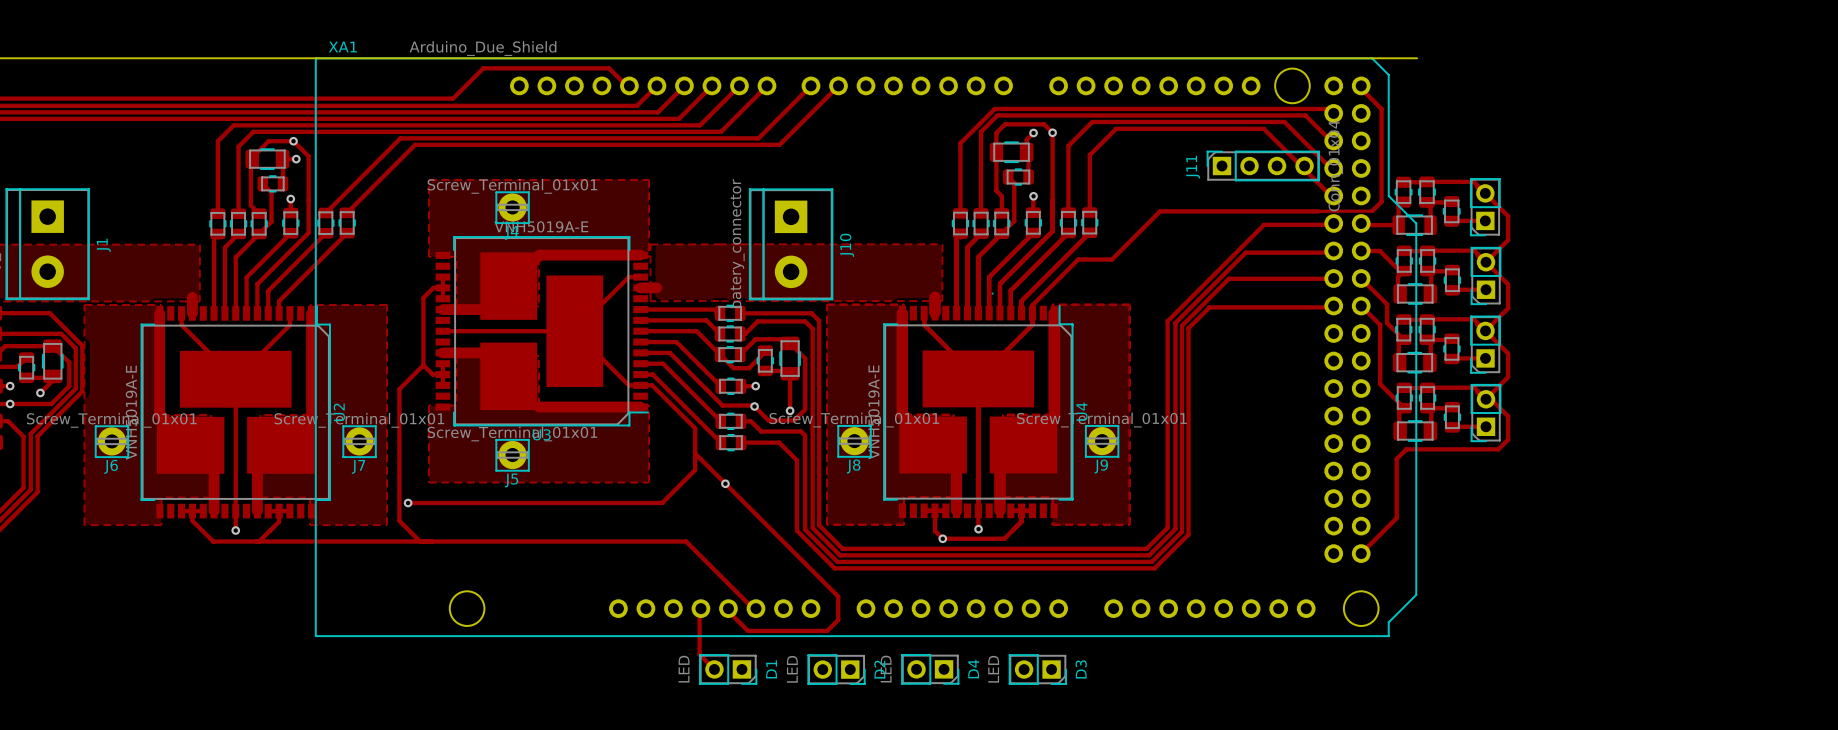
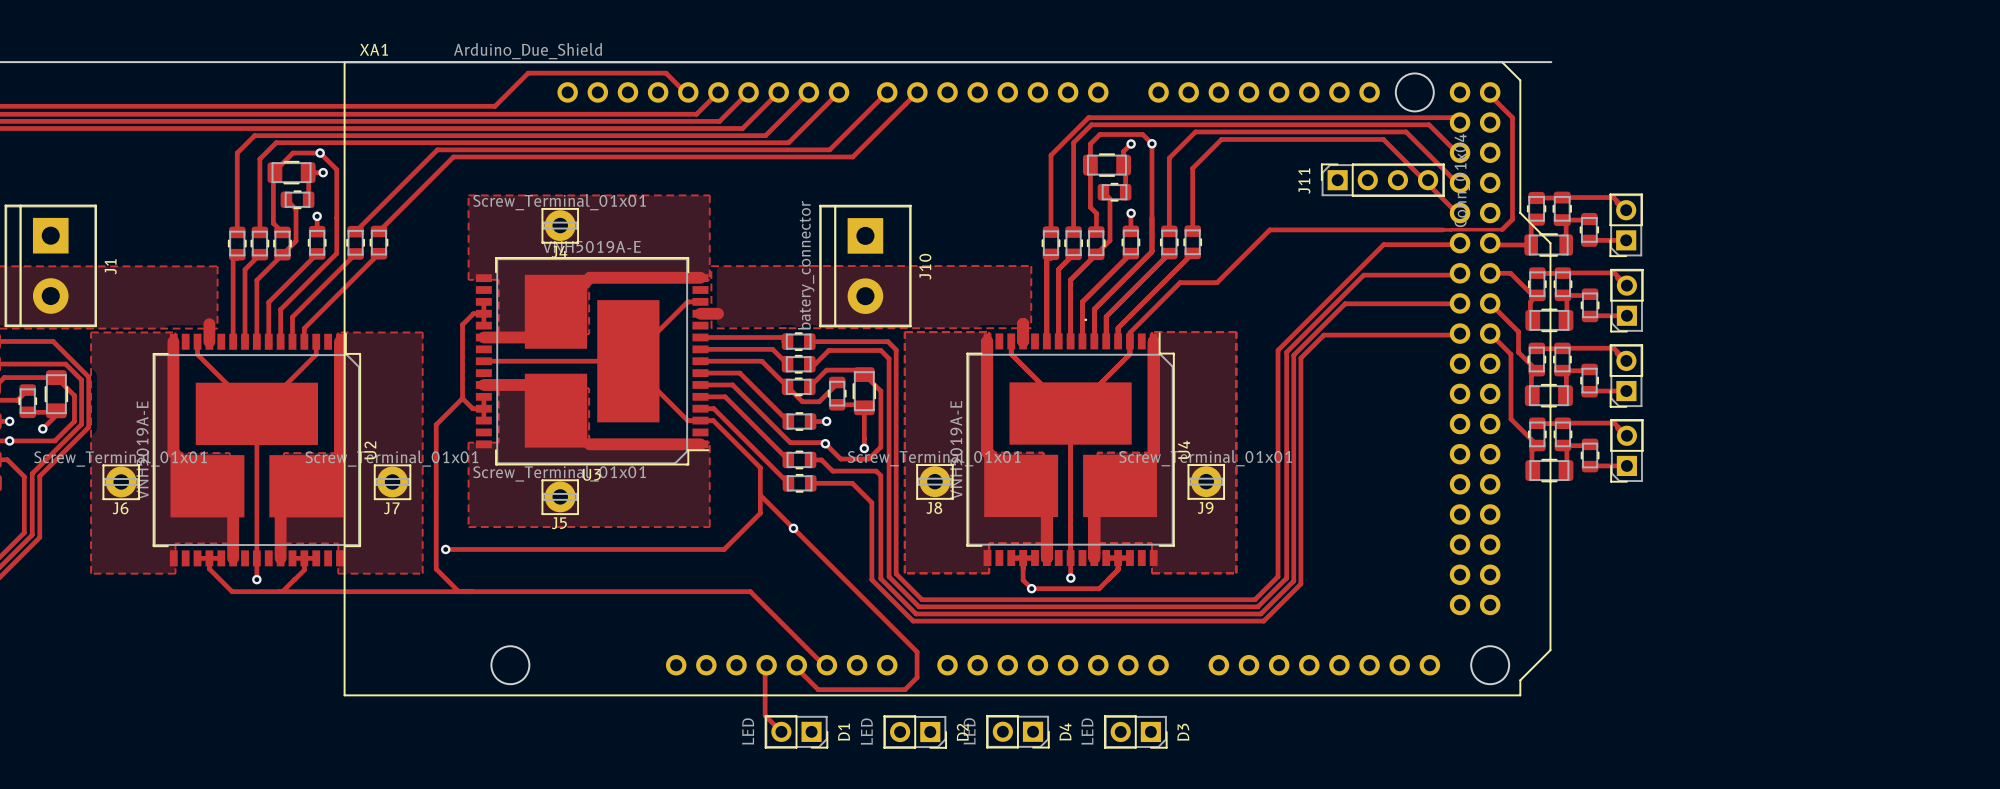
track: (1485, 193) (1508, 216) (1508, 240) (1486, 262) (1508, 284) (1508, 308) (1485, 330) (1508, 353) (1508, 377) (1486, 399) (1491, 399) (1508, 416) (1508, 439) (1498, 449) (1406, 449) (1396, 458) (1396, 518) (1361, 553) -> none

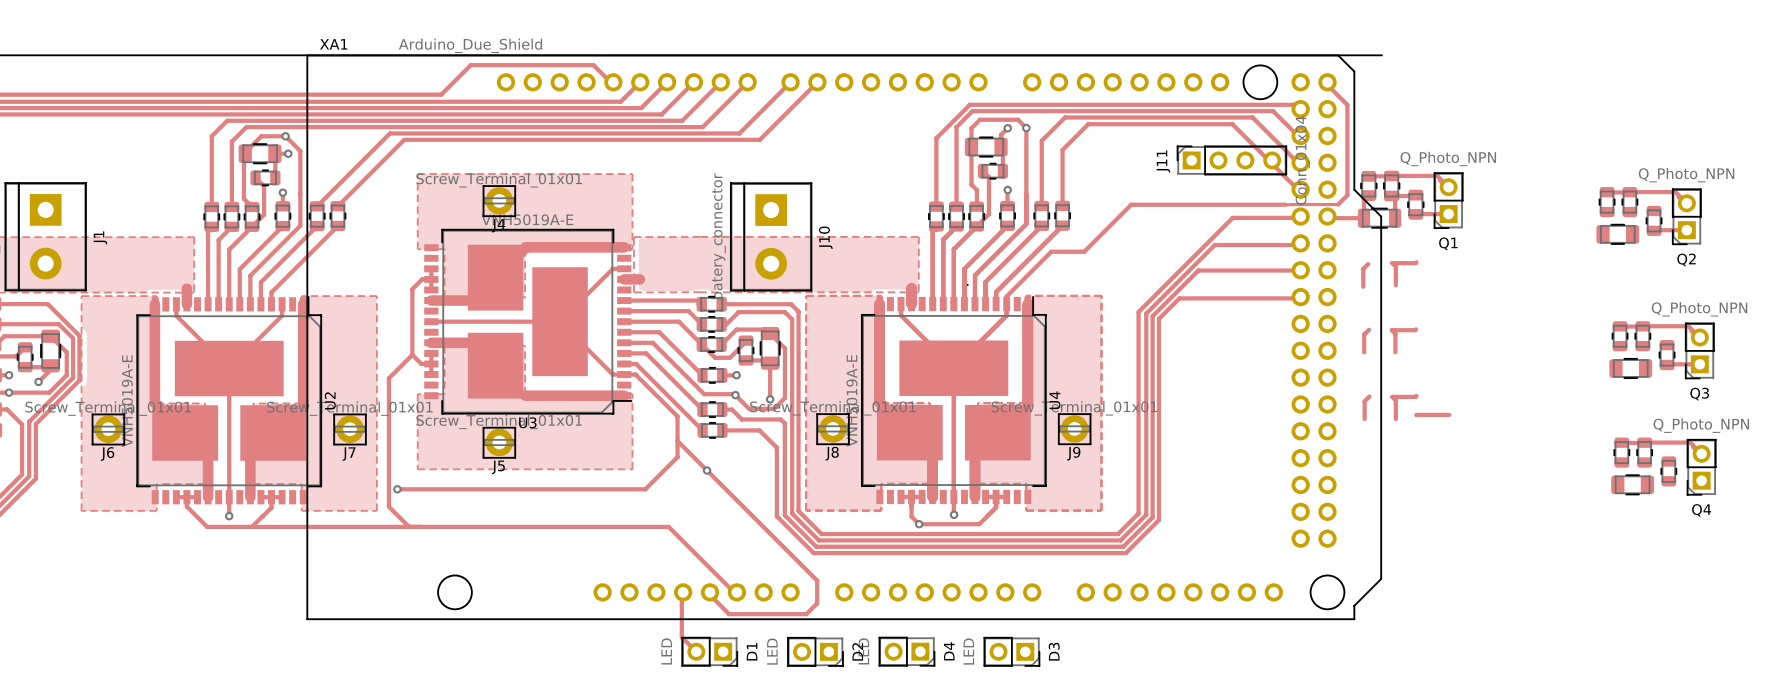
Q1 value: none -> Q_Photo_NPN (1448, 159)
part: none -> (1607, 202)
part: none -> (1629, 202)
Q2: none -> Q_Photo_NPN (1686, 216)
part: none -> (1654, 220)
part: none -> (1617, 234)
track: (1490, 273) (1510, 273) (1532, 295) (1537, 295) -> none
track: (1537, 273) (1614, 272) (1626, 285) (1617, 278) -> (1607, 192) (1675, 192) (1686, 203) (1678, 196)
Q1 name: none -> Q1 (1448, 243)
part: (1537, 284) -> none
part: (1562, 284) -> none
part: (1626, 300) -> none
track: (1490, 303) (1518, 331) (1518, 352) (1536, 370) -> none
part: (1590, 305) -> none
track: (1626, 315) (1590, 316) -> (1686, 230) (1654, 230)
part: (1549, 320) -> none
track: (1490, 333) (1510, 354) (1510, 419) (1537, 445) -> none
track: (1536, 348) (1613, 348) (1626, 360) (1616, 353) -> (1620, 326) (1688, 326) (1699, 337) (1691, 330)
part: (1536, 359) -> none
part: (1562, 359) -> none
part: (1626, 375) -> none
part: none -> (1620, 336)
part: none -> (1642, 336)
part: (1589, 380) -> none
track: (1626, 391) (1589, 391) -> (1699, 364) (1667, 364)
Q3: none -> Q_Photo_NPN (1699, 350)
part: (1548, 395) -> none
part: none -> (1667, 355)
part: none -> (1630, 368)
track: (1537, 423) (1614, 423) (1626, 435) (1617, 428) -> (1621, 442) (1690, 442) (1701, 453) (1693, 447)
part: (1537, 434) -> none
part: (1562, 434) -> none
part: (1626, 450) -> none
part: (1590, 455) -> none
part: (1549, 470) -> none
part: none -> (1621, 452)
part: none -> (1644, 452)
Q4: none -> Q_Photo_NPN (1701, 467)
part: none -> (1668, 471)
part: none -> (1632, 484)

